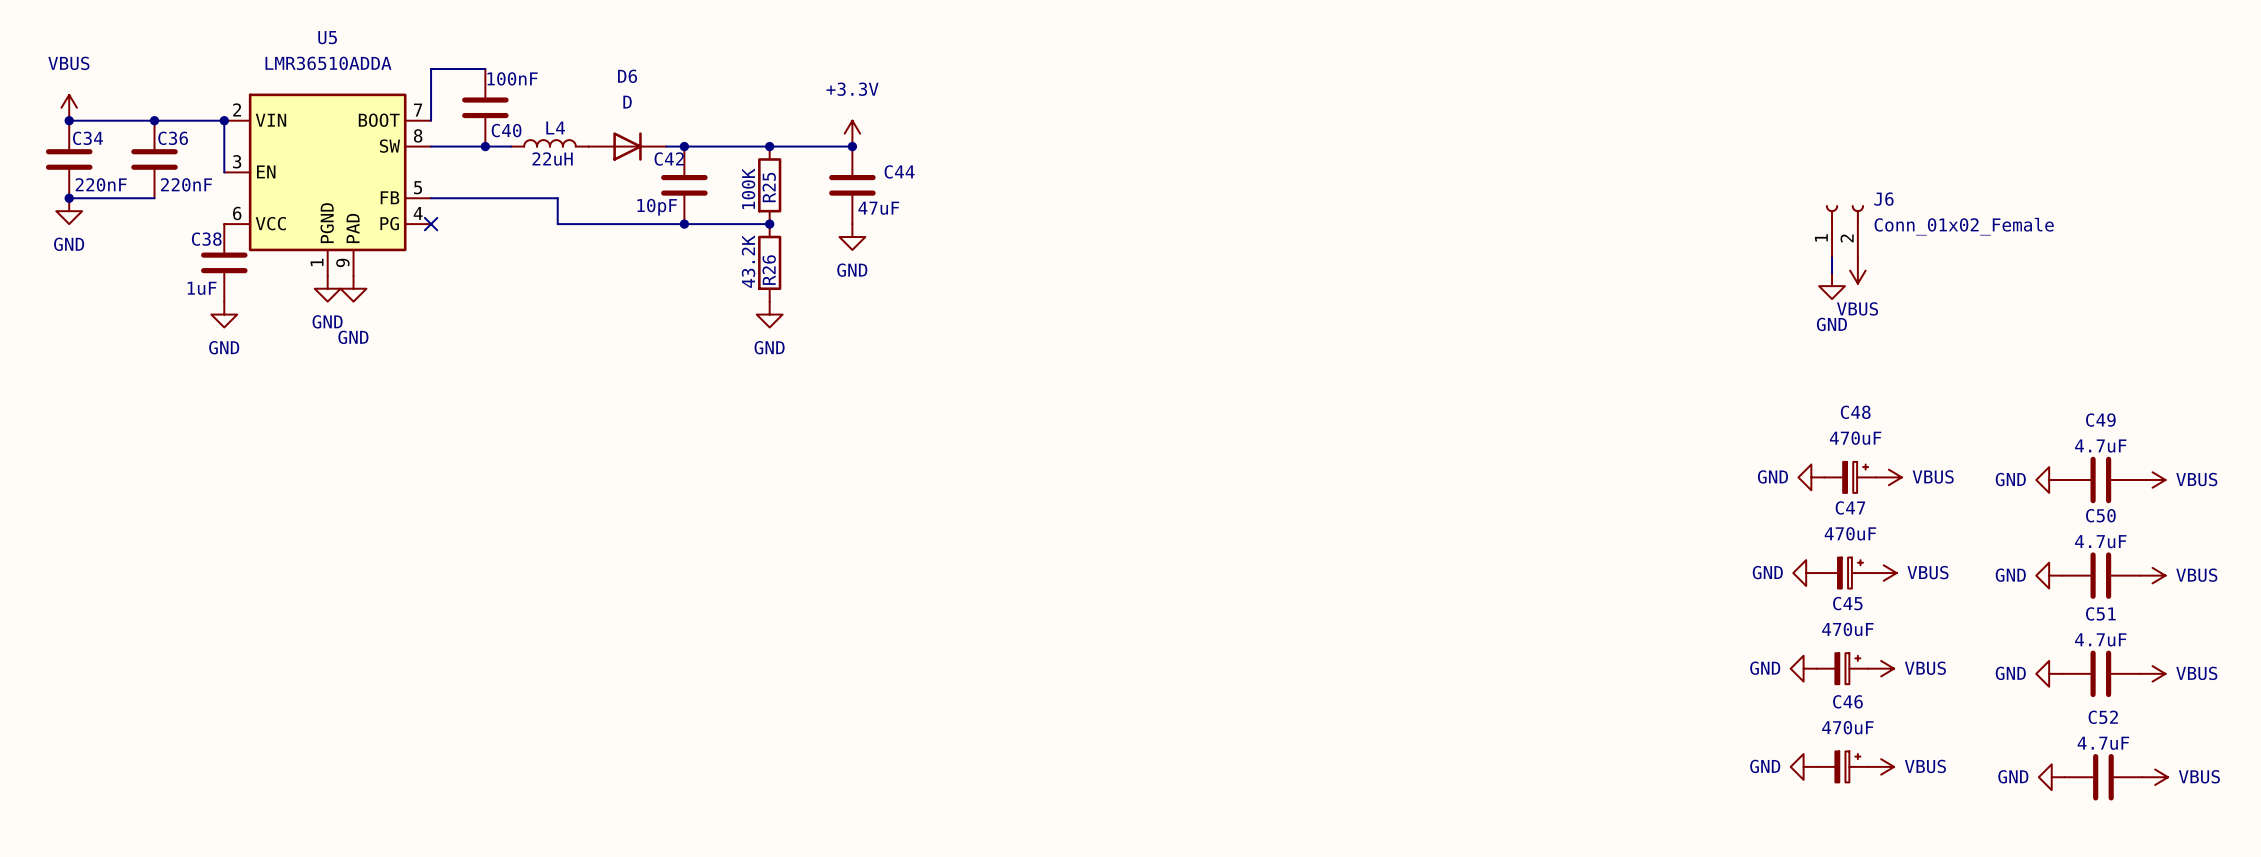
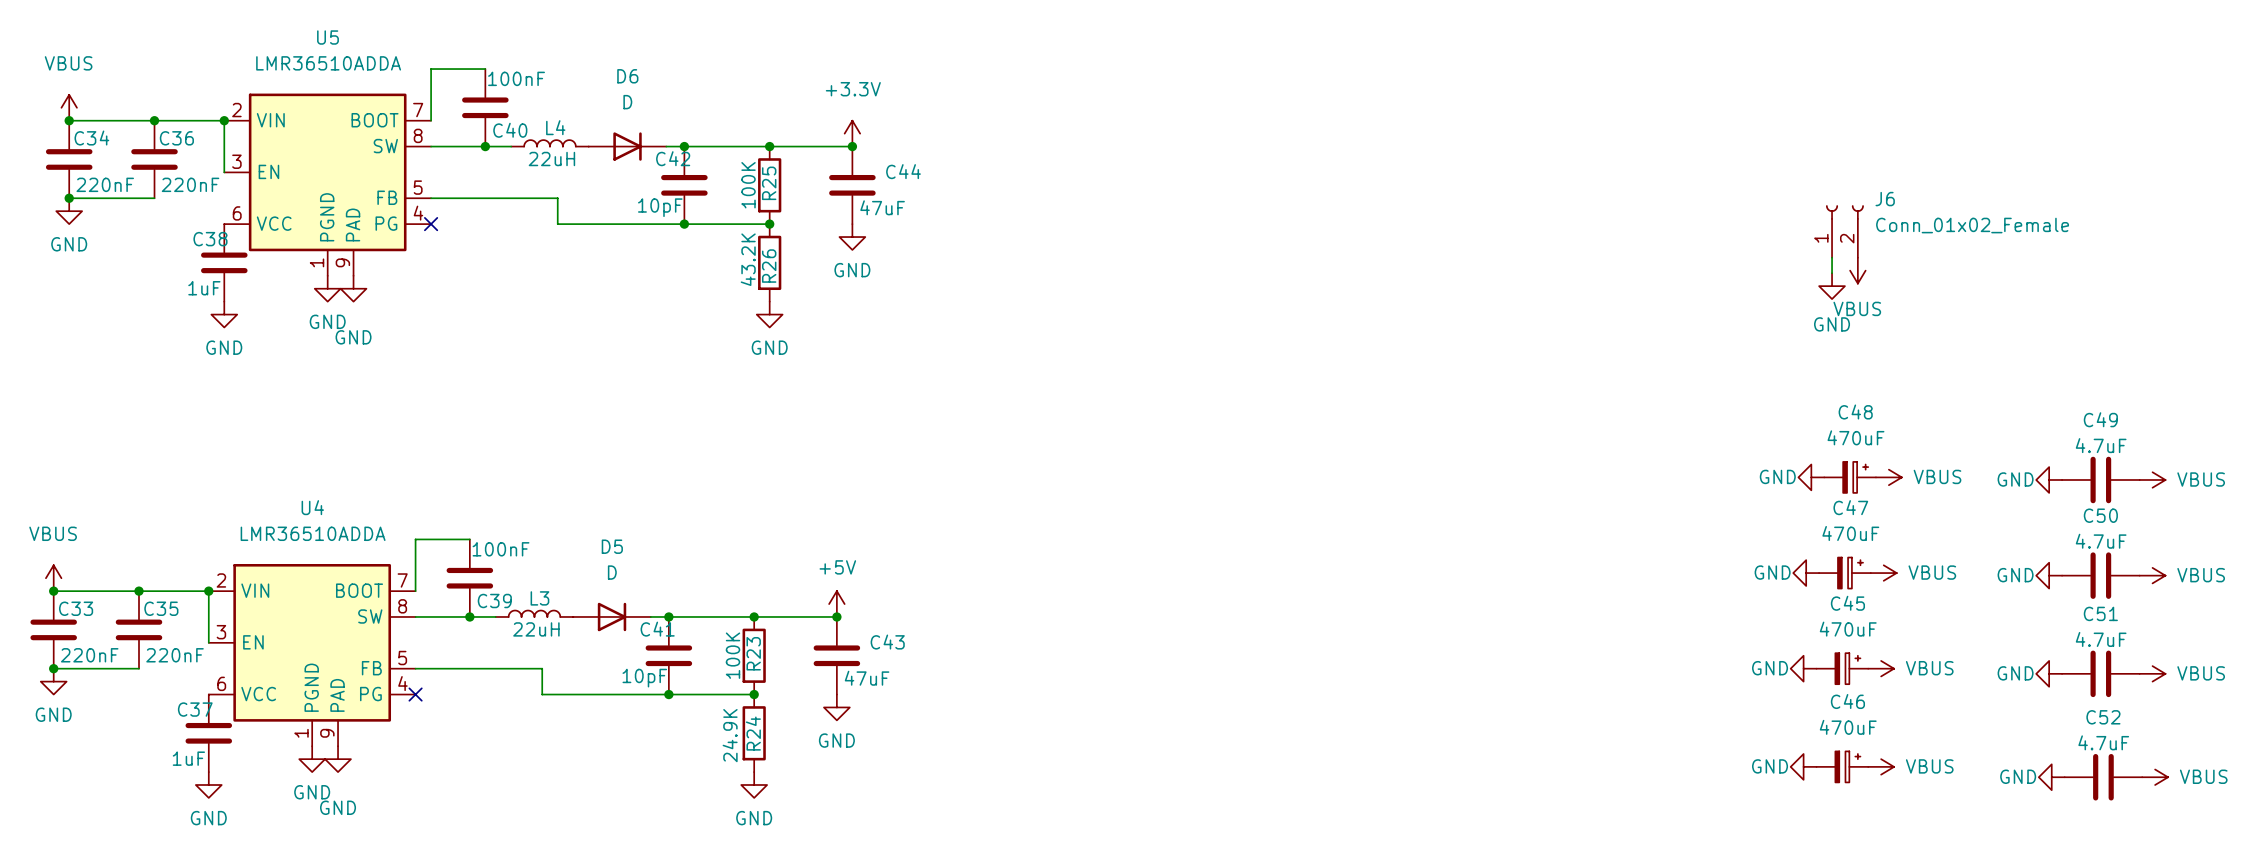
wire: none -> (469, 539) (415, 539) (415, 591)
power symbol: none -> VBUS (53, 578)
C39: none -> 100nF (469, 578)
wire: none -> (53, 591) (208, 591) (208, 642)
junction: none -> (53, 591)
junction: none -> (139, 591)
junction: none -> (208, 591)
power symbol: none -> +5V (836, 604)
L3: none -> 22uH (534, 613)
wire: none -> (415, 616) (495, 616)
junction: none -> (469, 616)
D5: none -> D (612, 616)
wire: none -> (650, 616) (836, 616)
junction: none -> (668, 616)
junction: none -> (754, 616)
junction: none -> (836, 616)
C33: none -> 220nF (53, 629)
C35: none -> 220nF (139, 629)
U4: none -> LMR36510ADDA (312, 655)
C41: none -> 10pF (668, 655)
R23: none -> 100K (754, 655)
C43: none -> 47uF (836, 655)
wire: none -> (53, 668) (139, 668)
junction: none -> (53, 668)
wire: none -> (415, 668) (542, 668) (542, 694) (754, 694)
power symbol: none -> GND (53, 681)
no-connect mark: none -> (415, 694)
junction: none -> (668, 694)
junction: none -> (754, 694)
power symbol: none -> GND (836, 707)
C37: none -> 1uF (208, 733)
R24: none -> 24.9K (754, 733)
power symbol: none -> GND (312, 759)
power symbol: none -> GND (338, 759)
power symbol: none -> GND (208, 785)
power symbol: none -> GND (754, 785)

